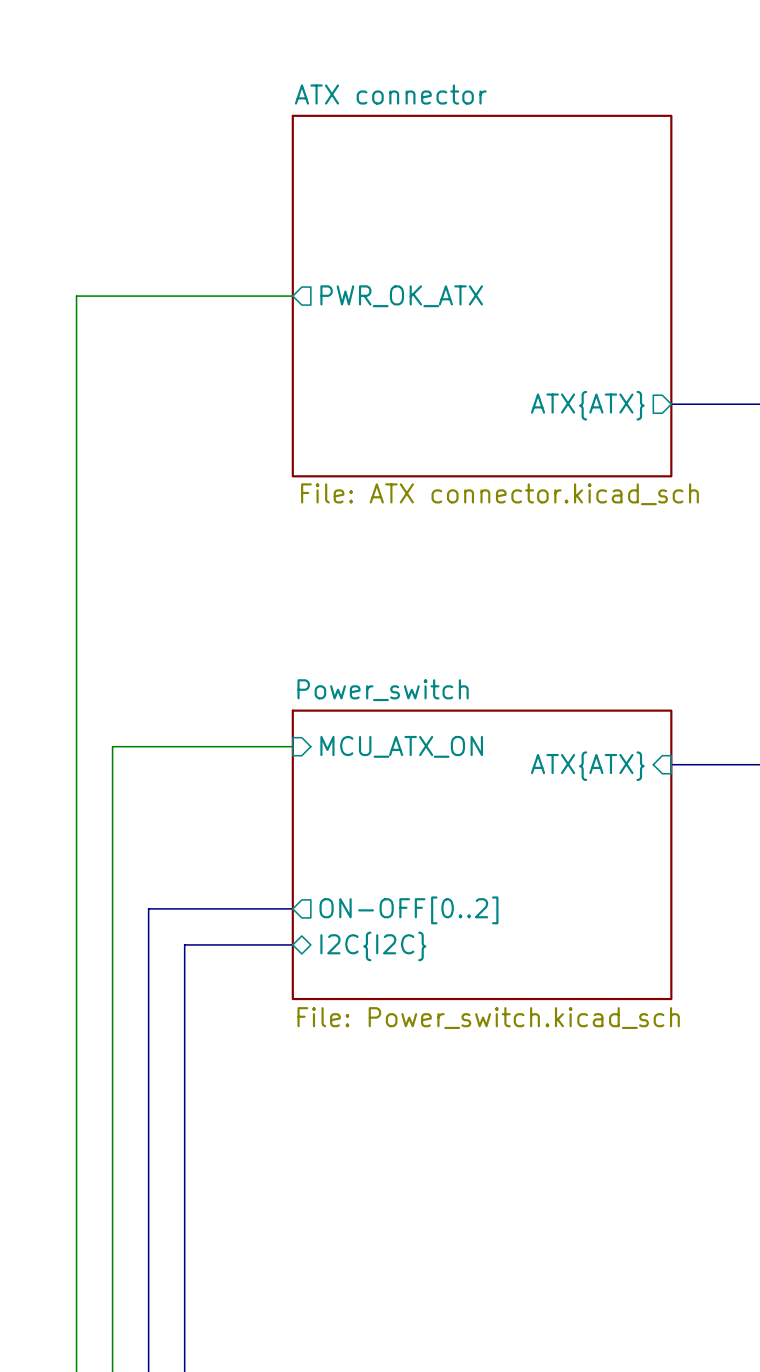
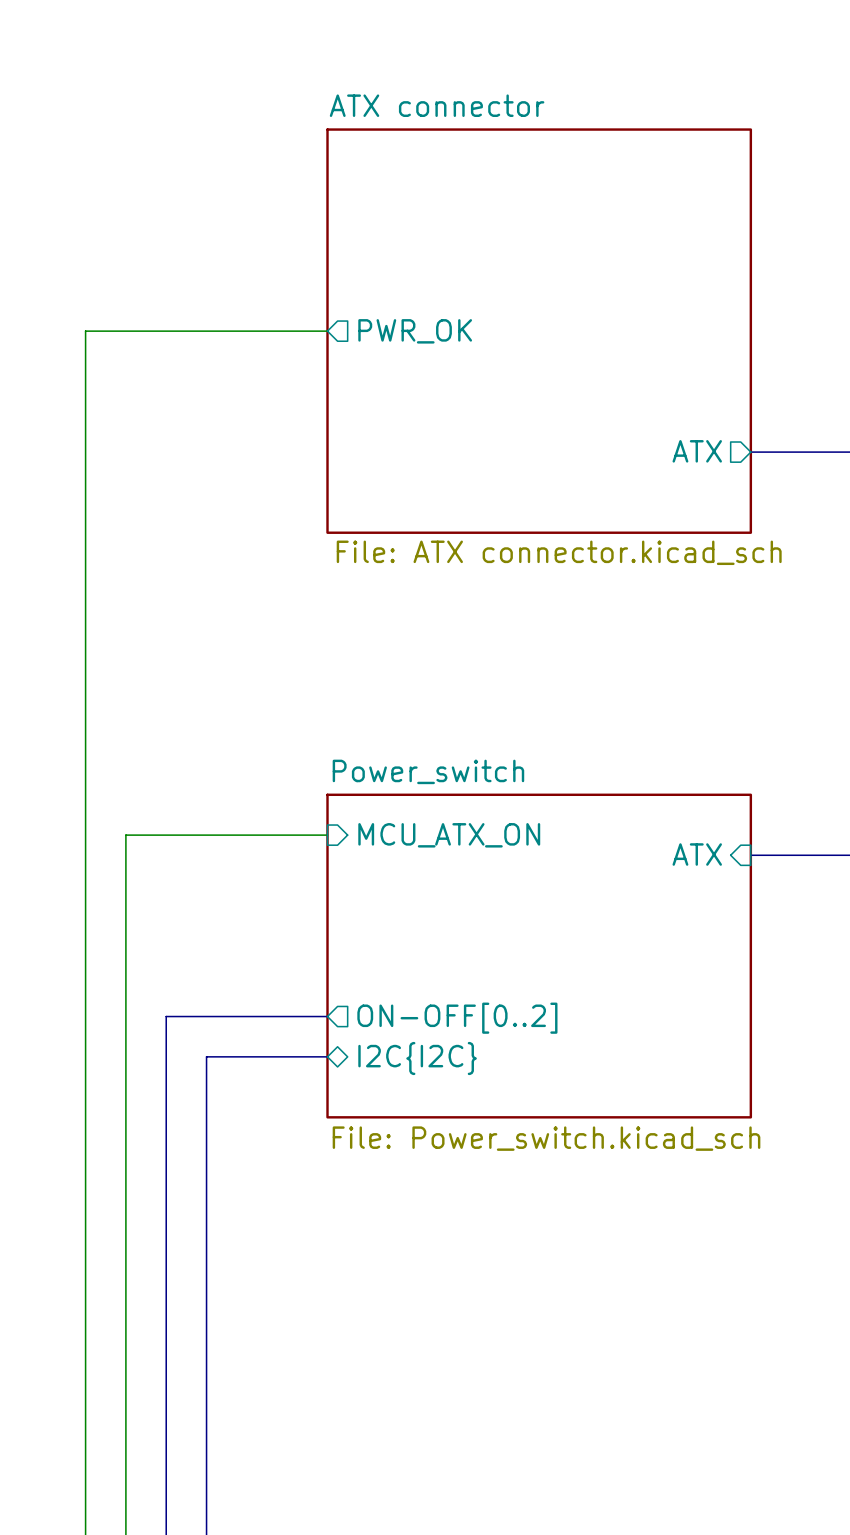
sheet pin: PWR_OK_ATX (401, 296) -> PWR_OK (415, 331)
sheet pin: ATX{ATX} (587, 405) -> ATX (697, 451)
sheet pin: ATX{ATX} (587, 766) -> ATX (697, 854)

